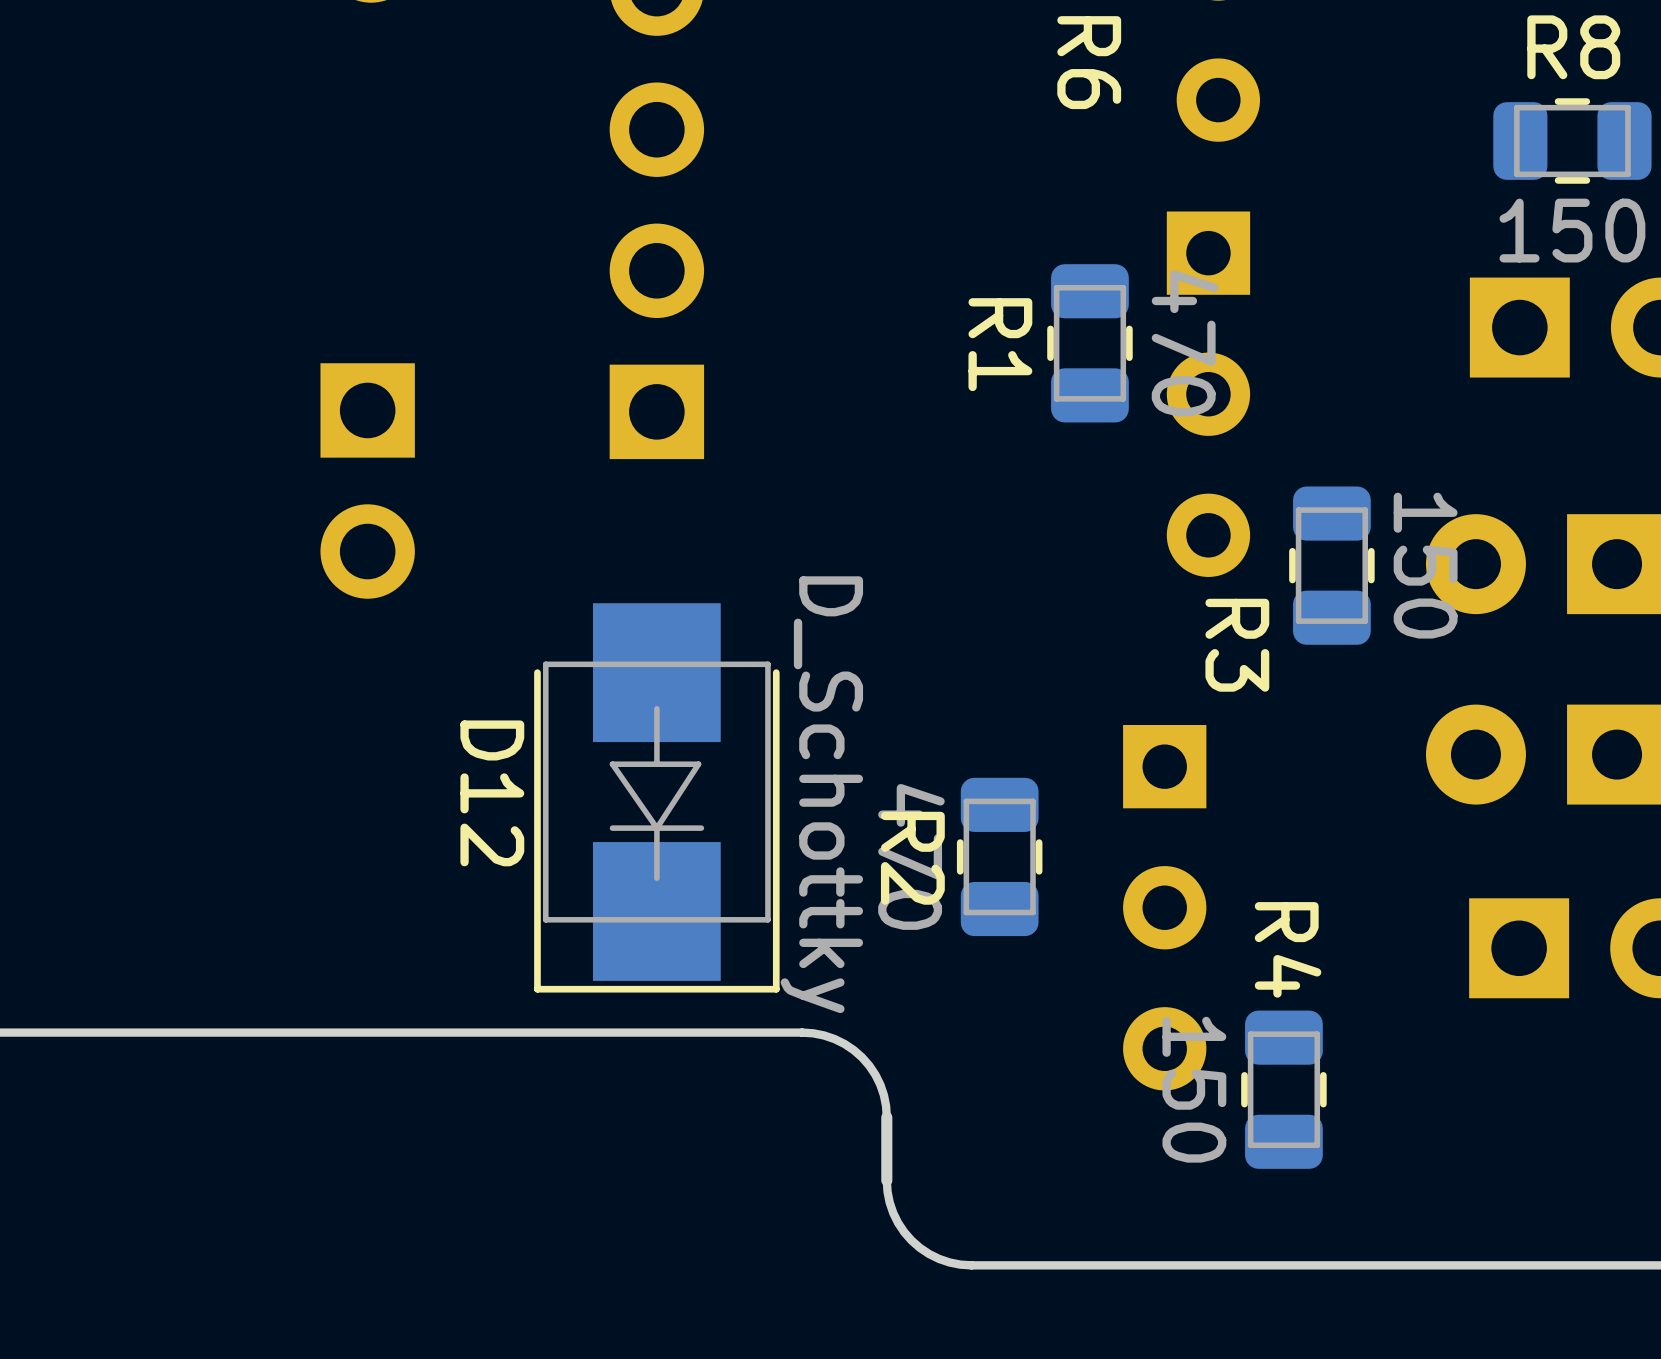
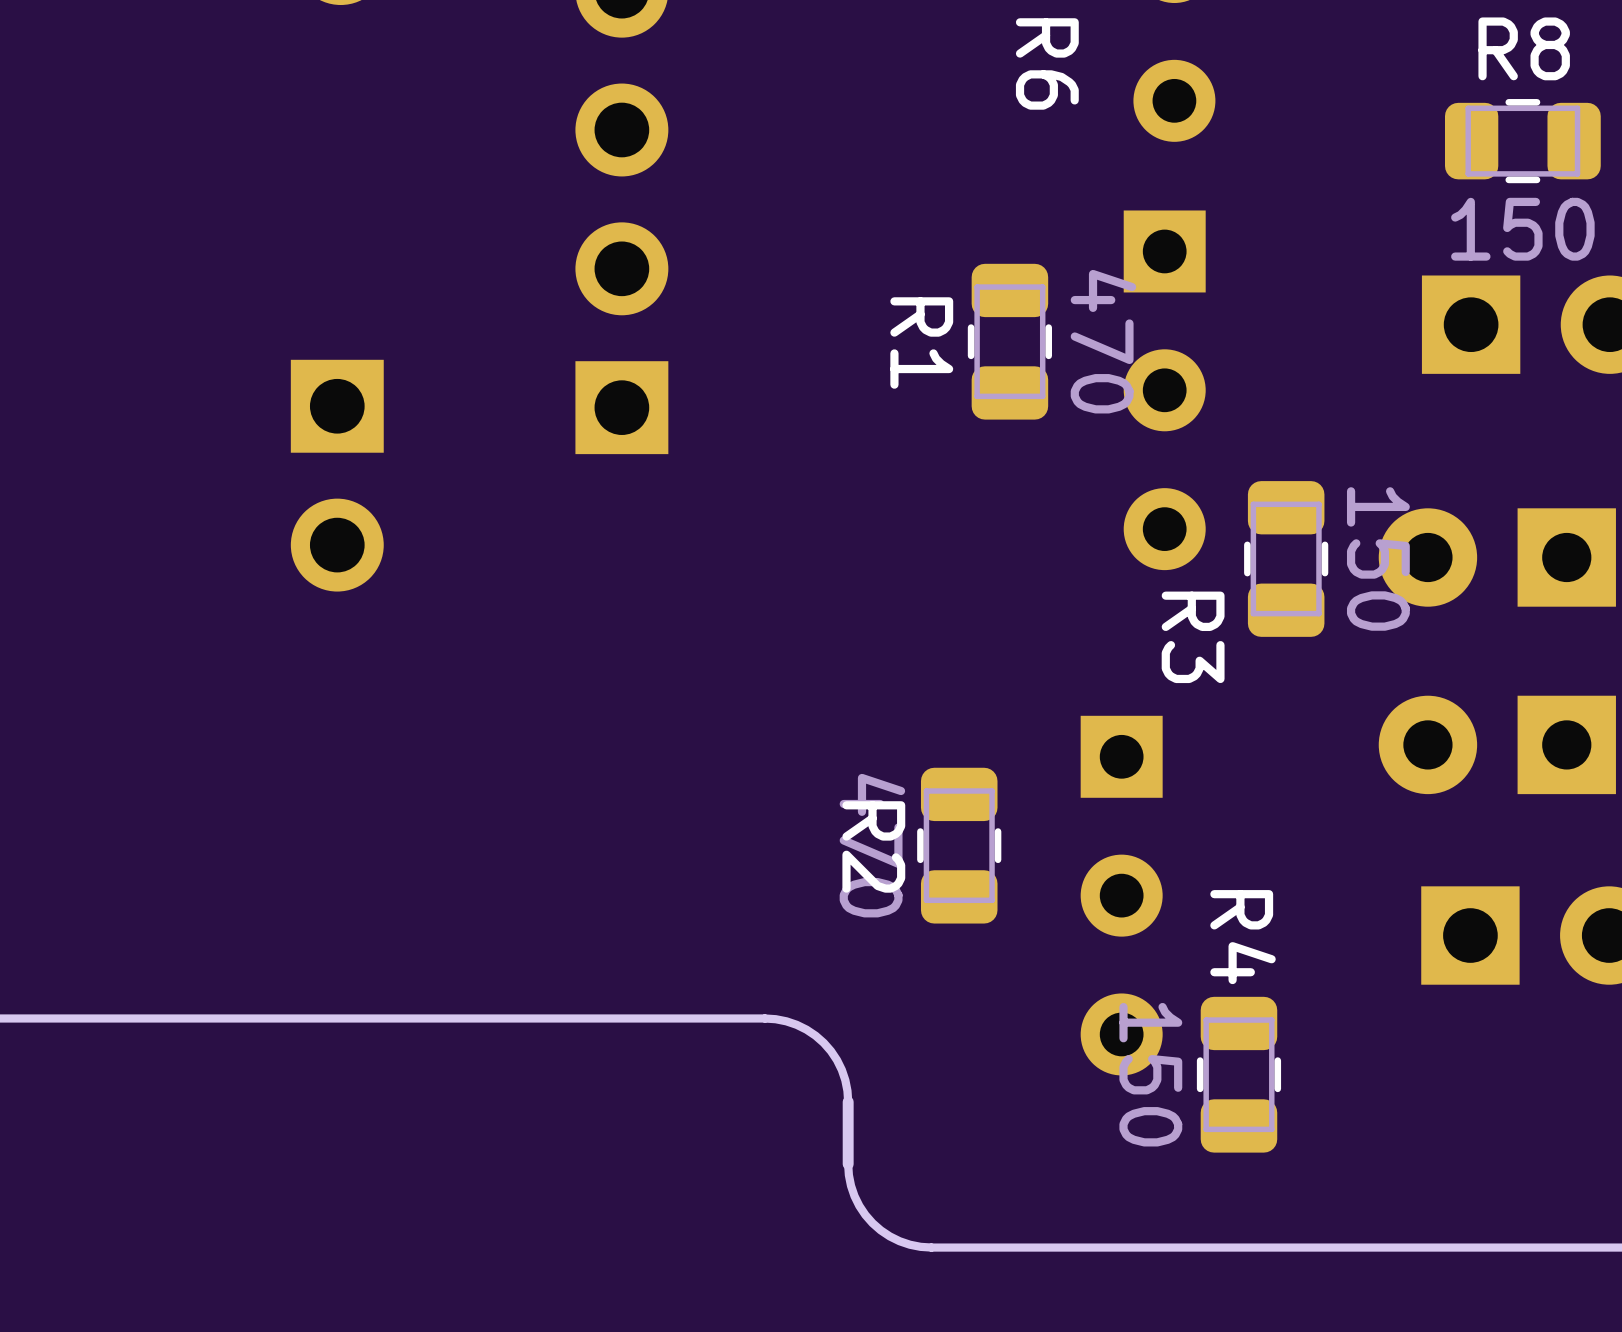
R1 position: (1089, 343) -> (1009, 341)
D12: D_Schottky (656, 797) -> none

